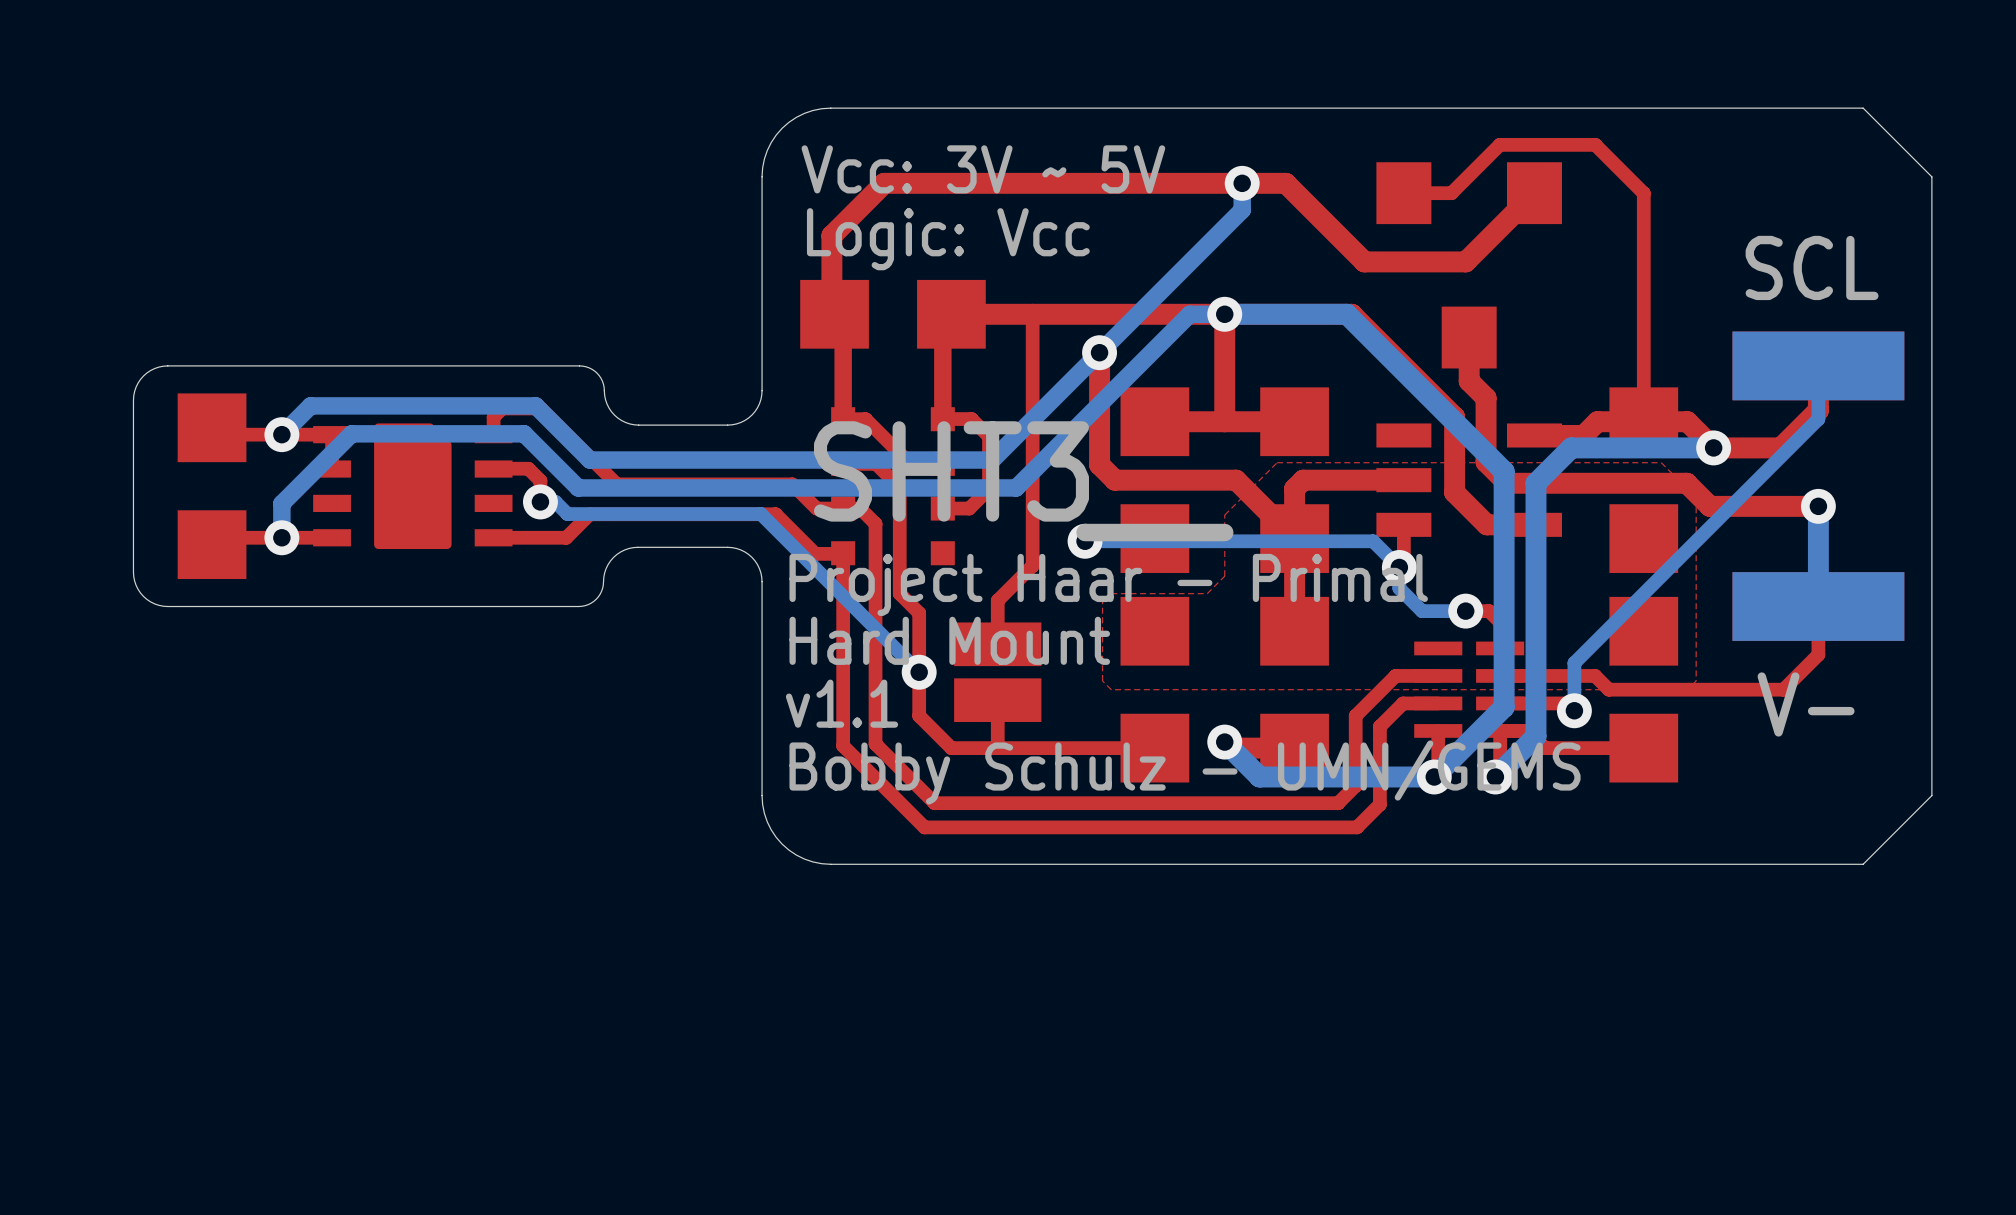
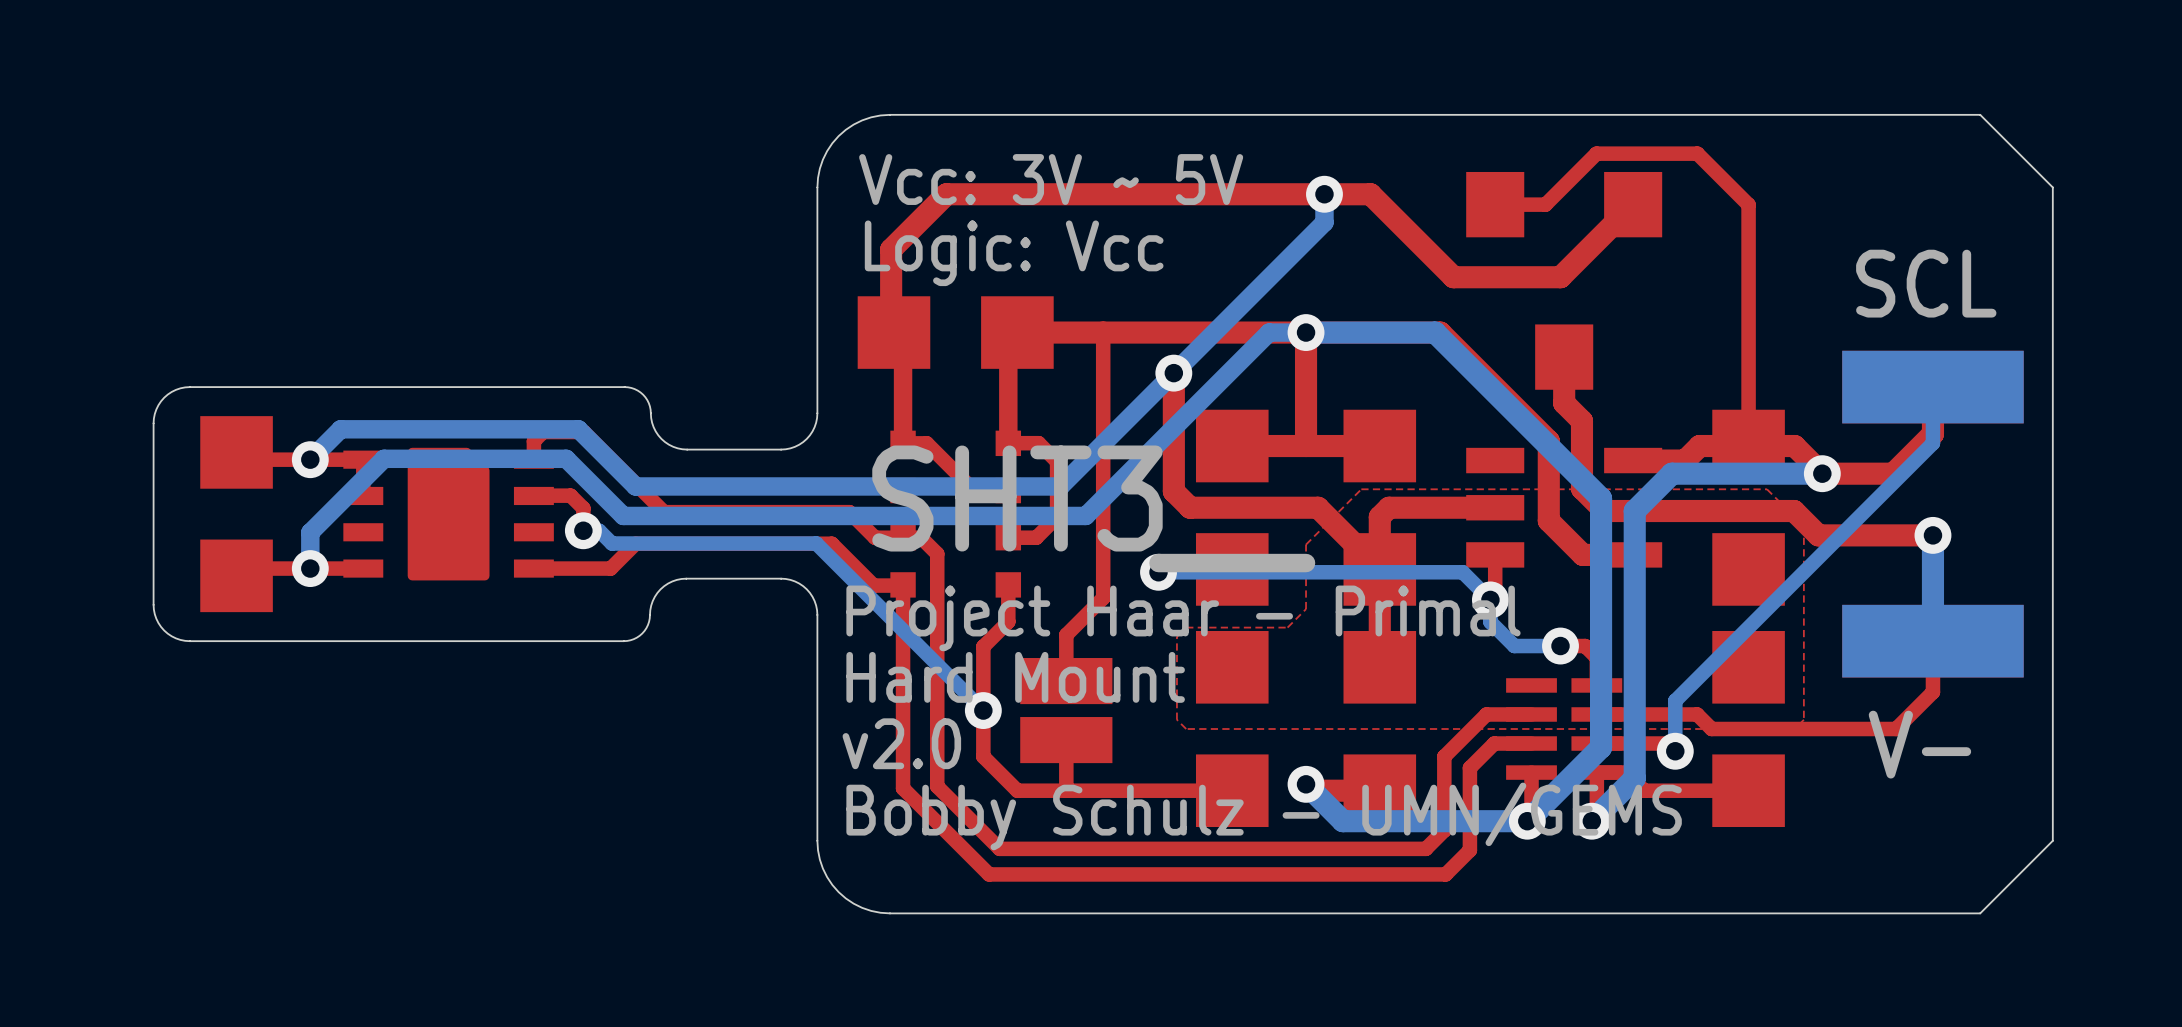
top track: (843, 463) (876, 463) (899, 487) (899, 593) (919, 613) -> (1008, 584) (1008, 621) (983, 646)
text: v1.1 (842, 703) -> v2.0 (901, 743)

